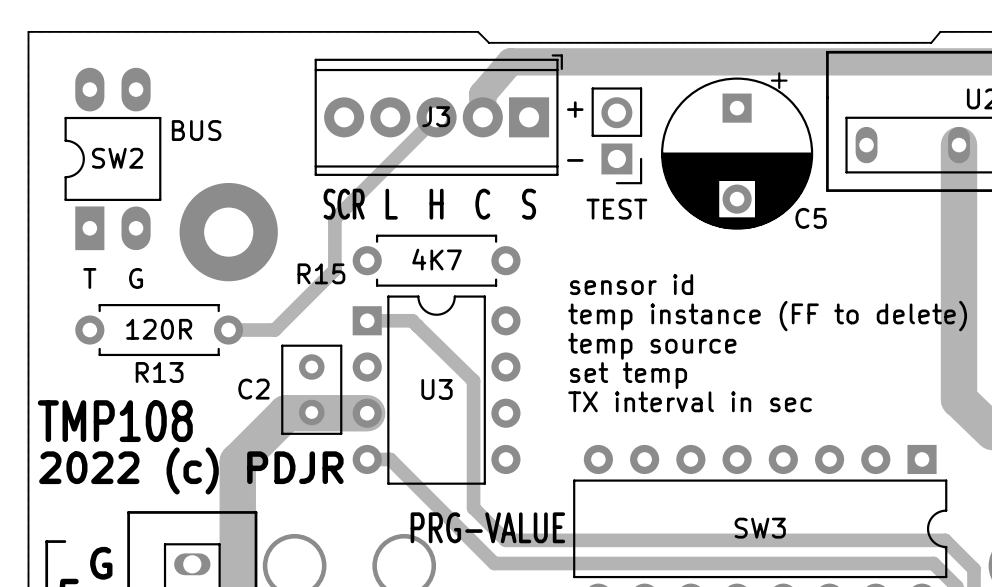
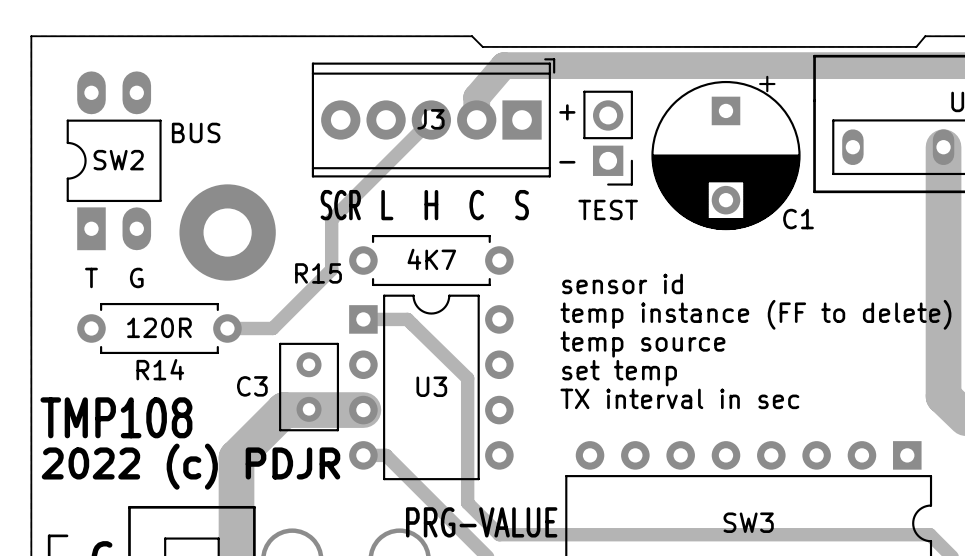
C5 name: C5 (811, 218) -> C1 (798, 219)
R13 name: R13 (159, 372) -> R14 (160, 369)
C2 name: C2 (253, 389) -> C3 (252, 386)

